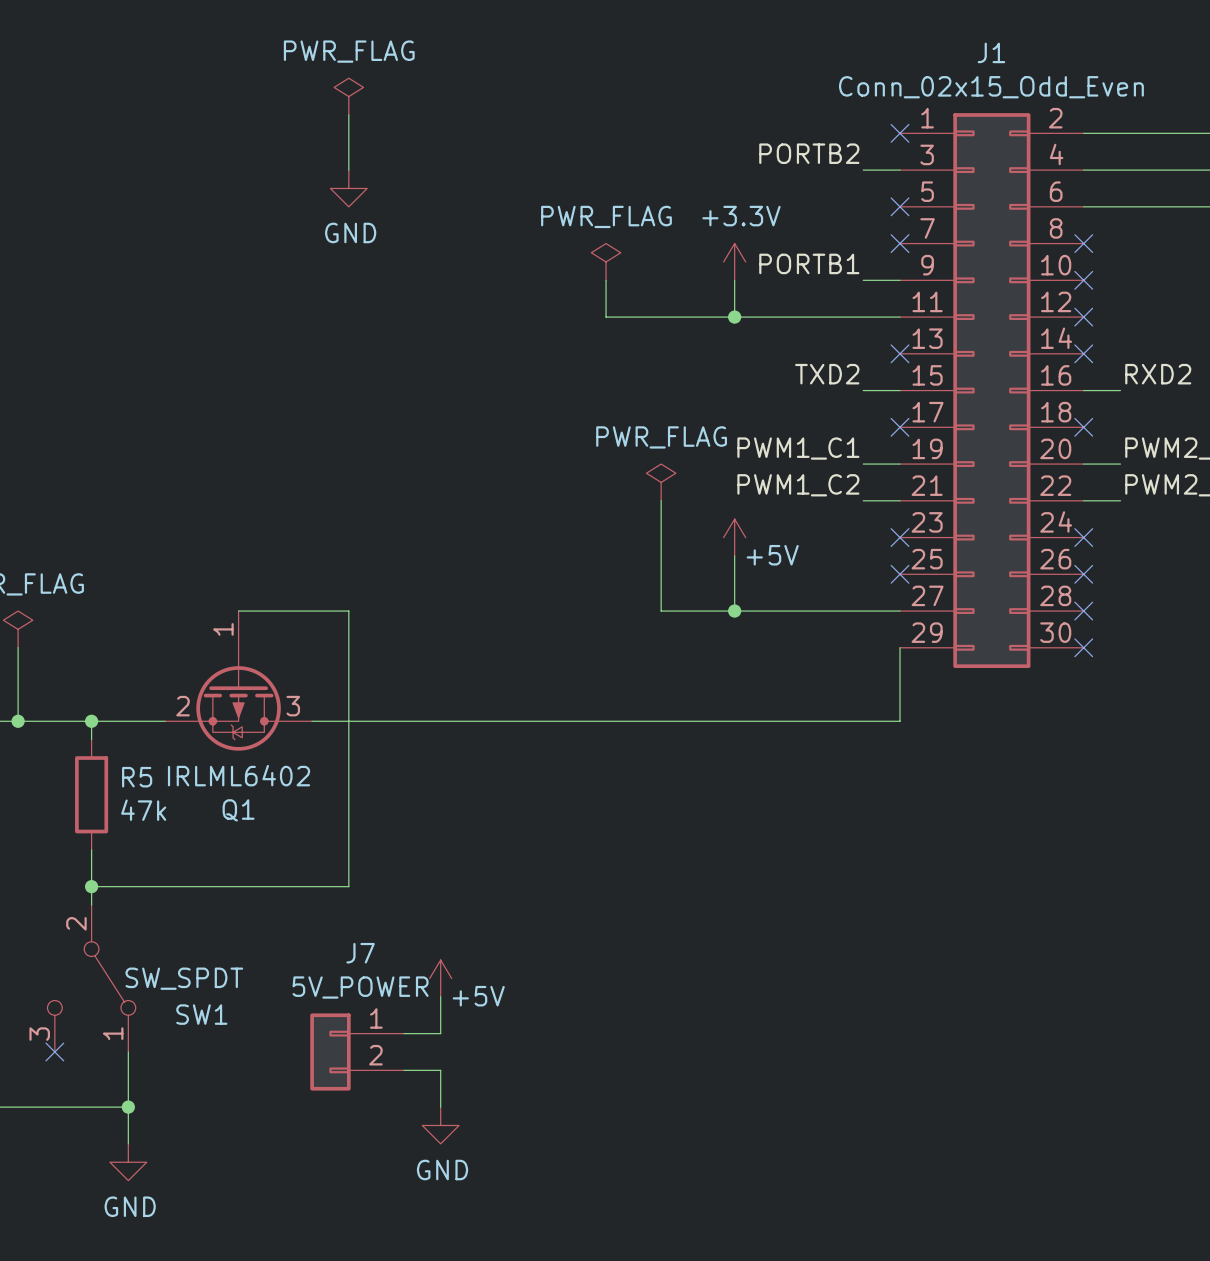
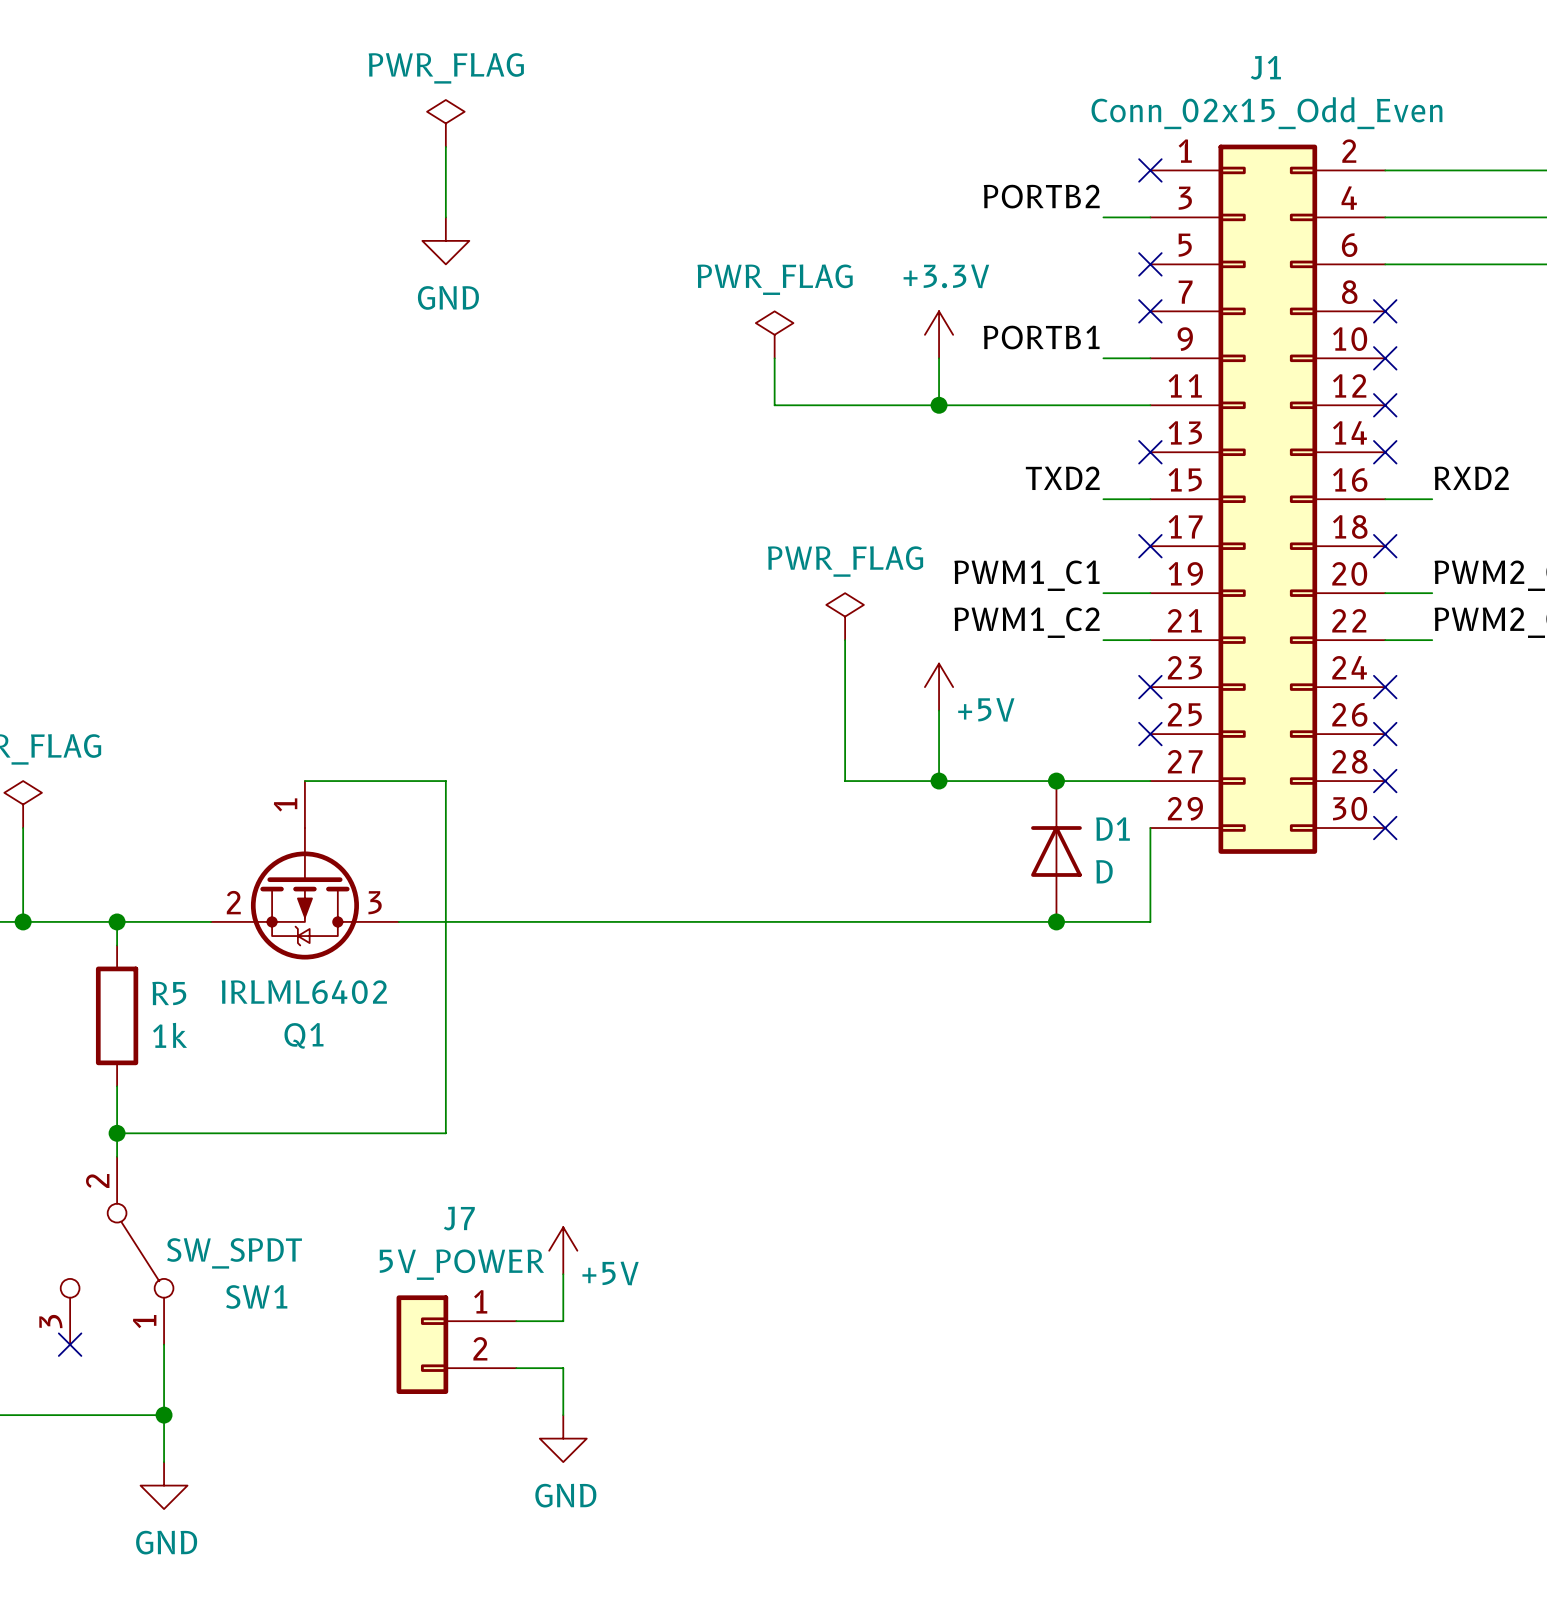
junction: none -> (1056, 781)
D1: none -> D (1056, 851)
junction: none -> (1056, 921)
R5 value: 47k (143, 810) -> 1k (170, 1035)

